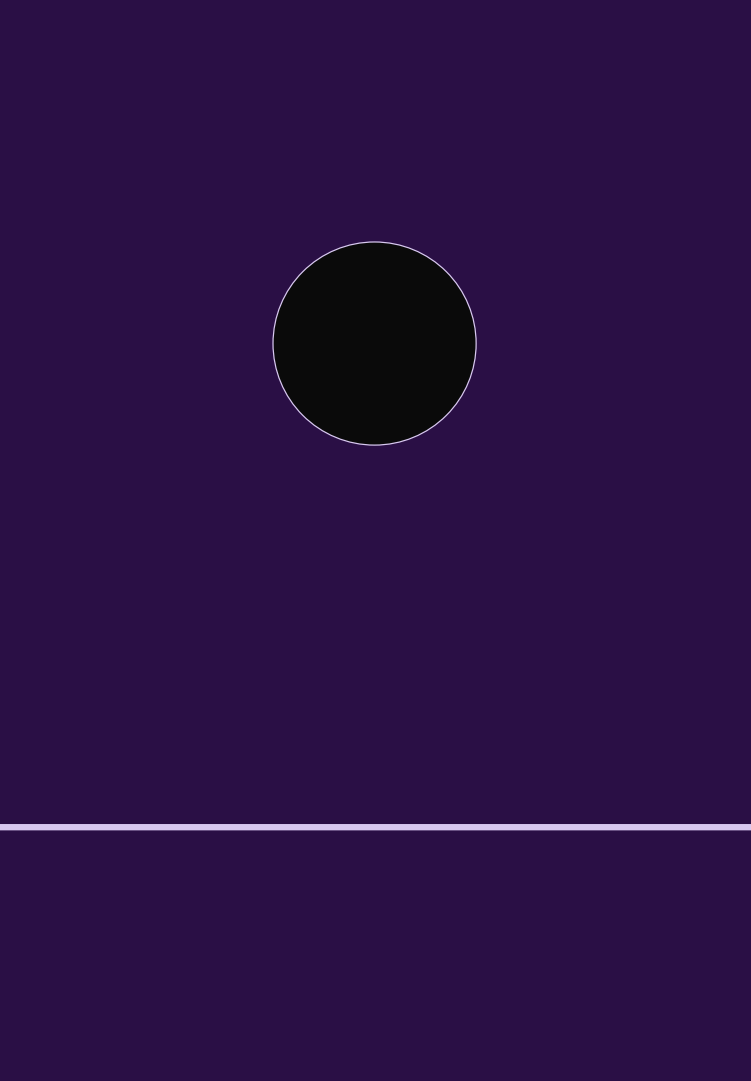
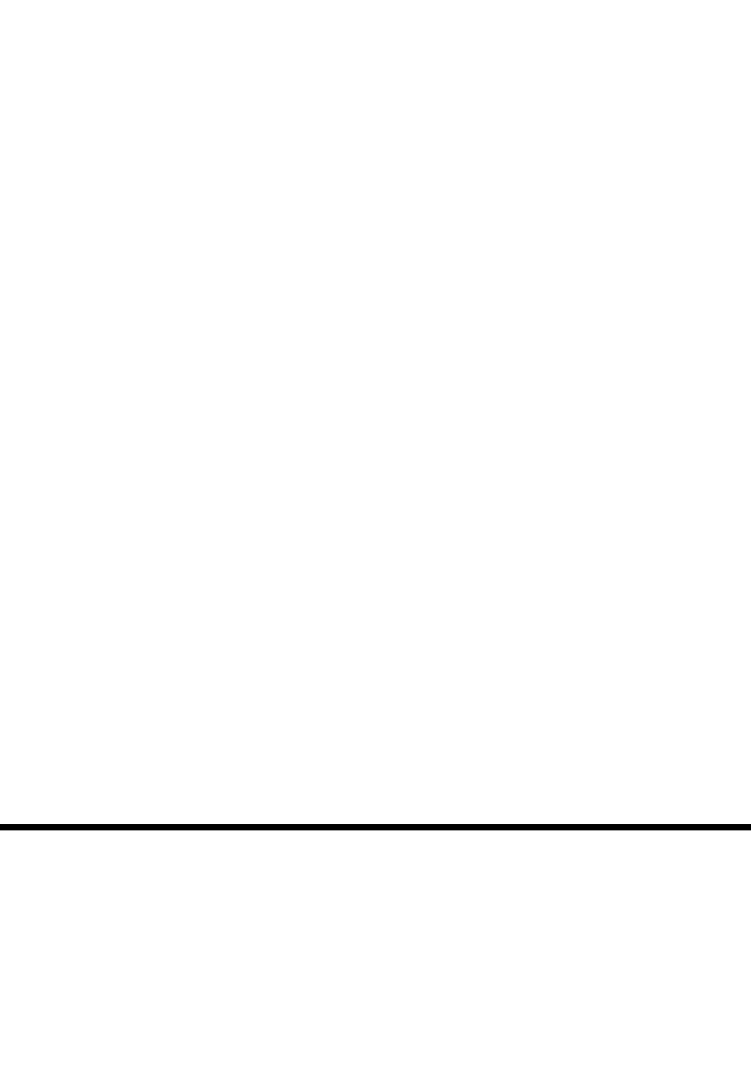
part: (374, 343) -> none

